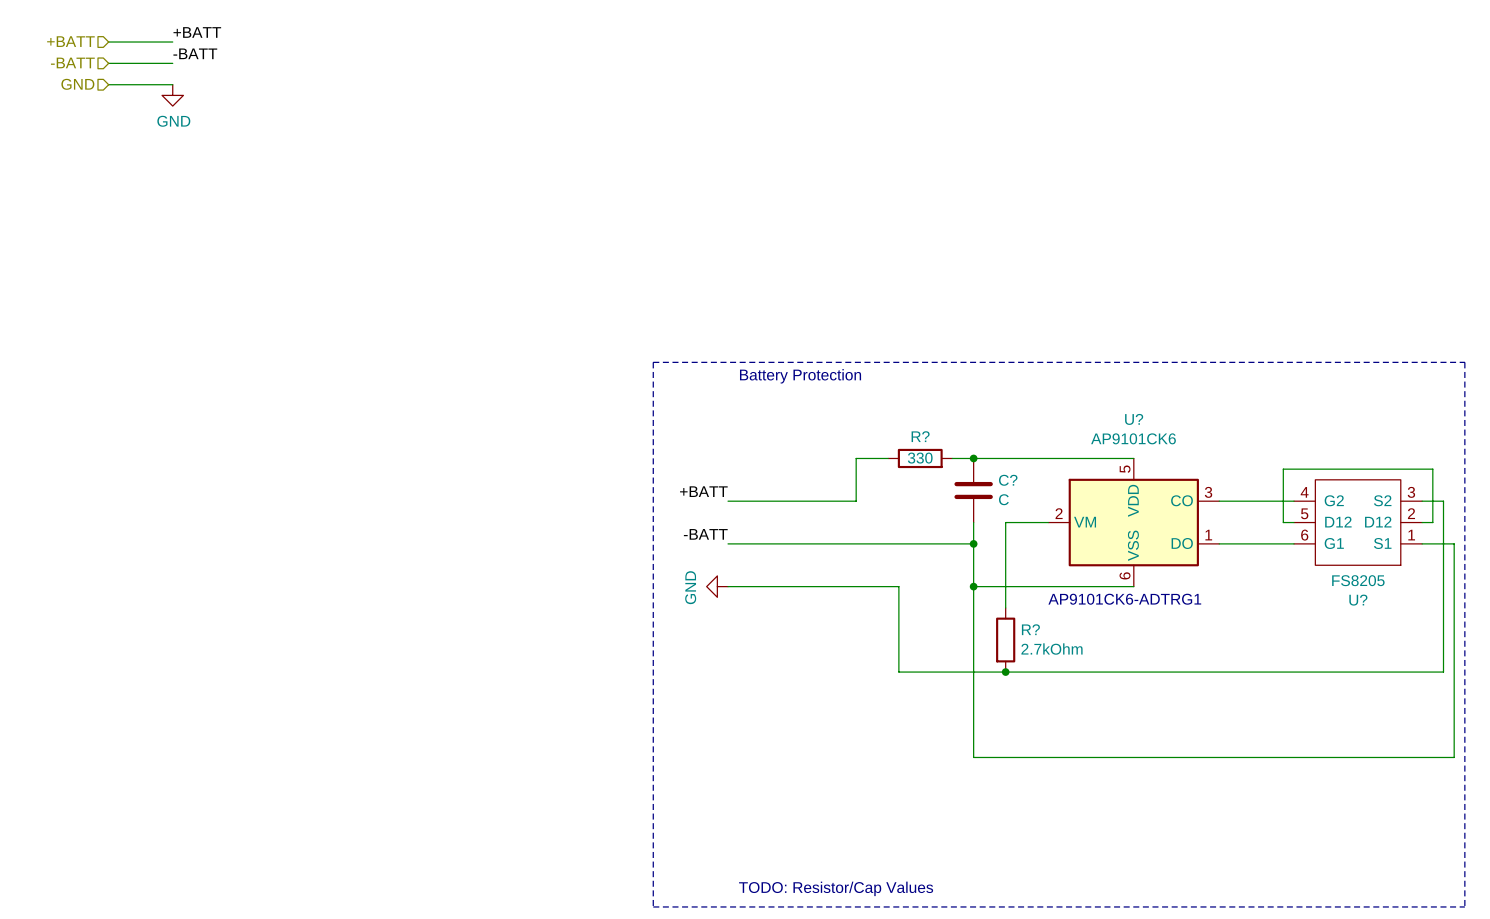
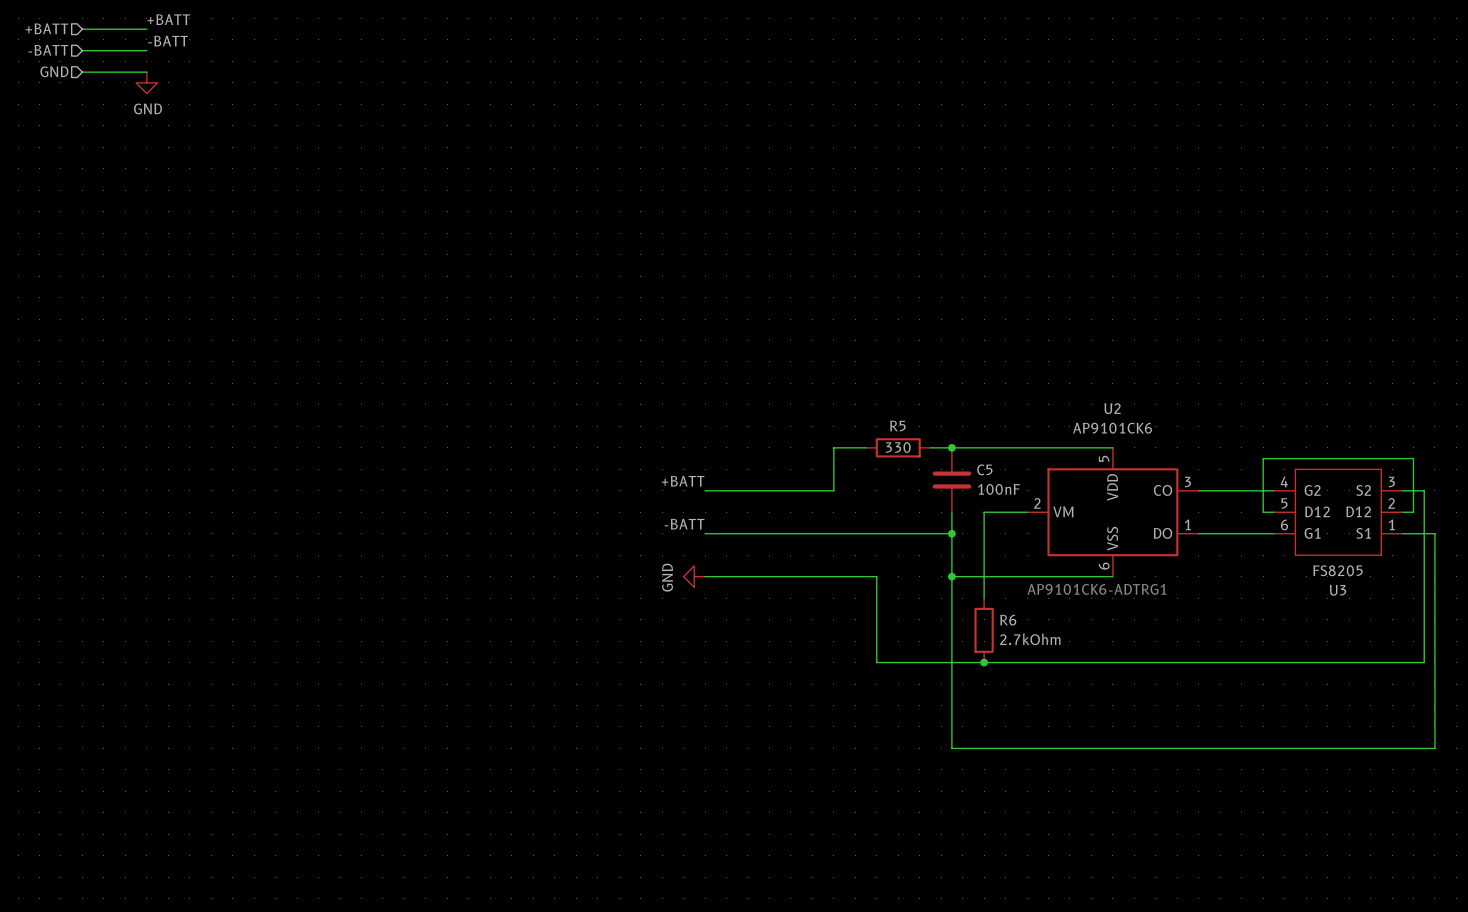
line: (653, 362) (653, 906) (1464, 906) (1464, 362) (653, 362) -> none
text: Battery Protection (800, 376) -> none
U? name: U? (1134, 419) -> U2 (1112, 408)
R? name: R? (920, 436) -> R5 (897, 426)
C? name: C? (1008, 480) -> C5 (984, 469)
C? value: C (1003, 499) -> 100nF (998, 489)
U? name: U? (1358, 600) -> U3 (1338, 590)
R? name: R? (1030, 629) -> R6 (1008, 620)
text: TODO: Resistor/Cap Values (836, 888) -> none

